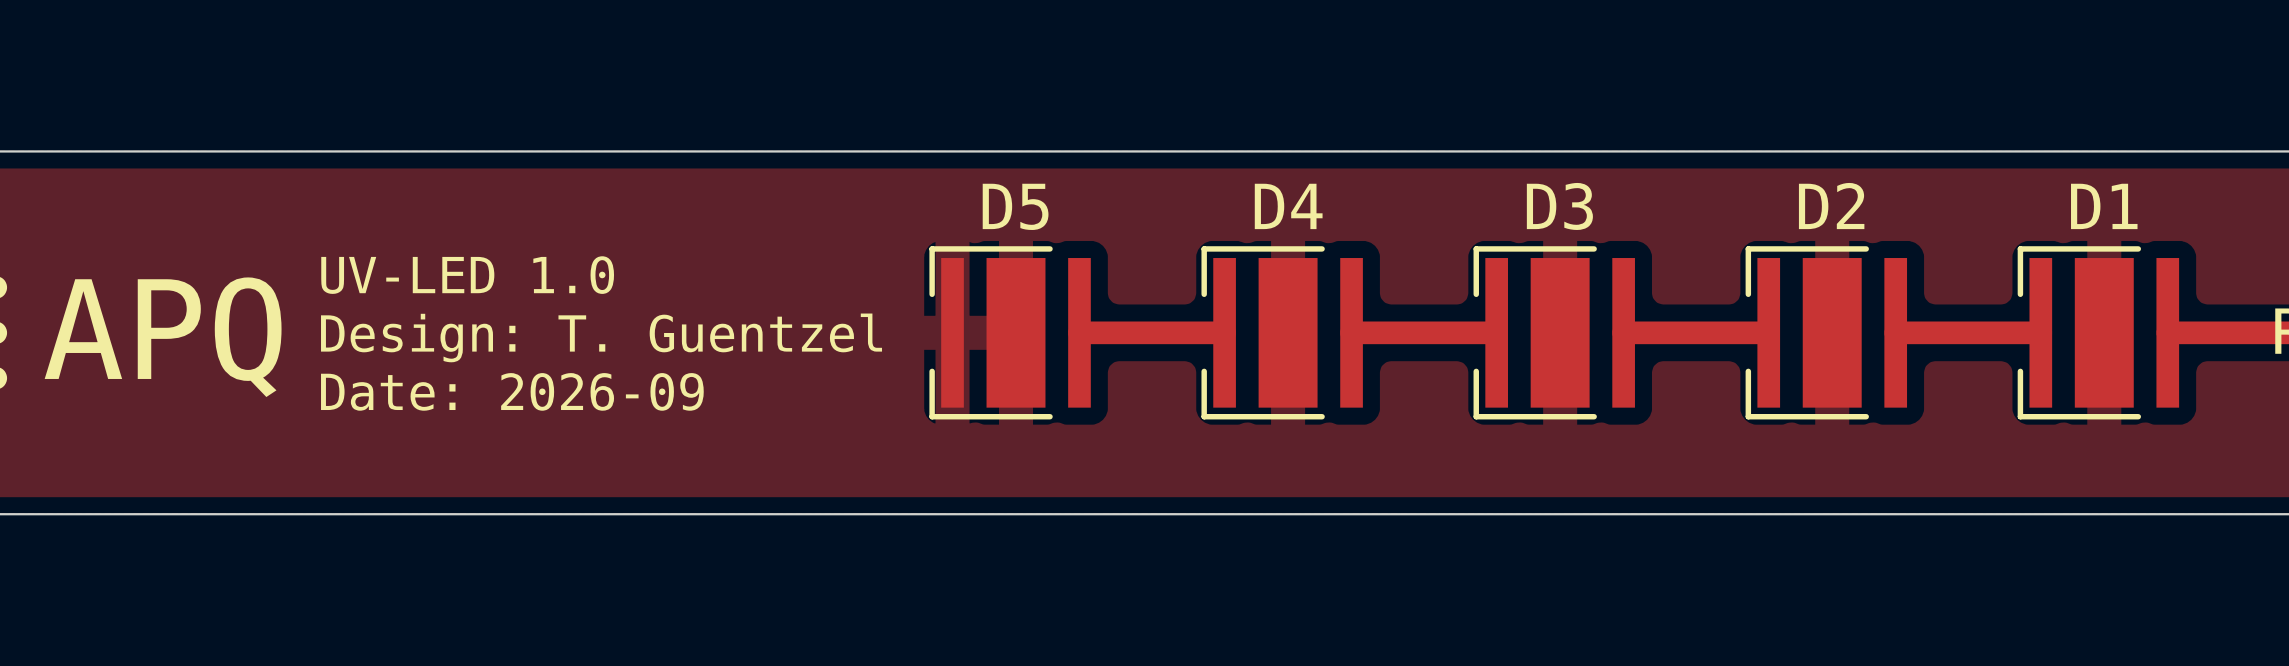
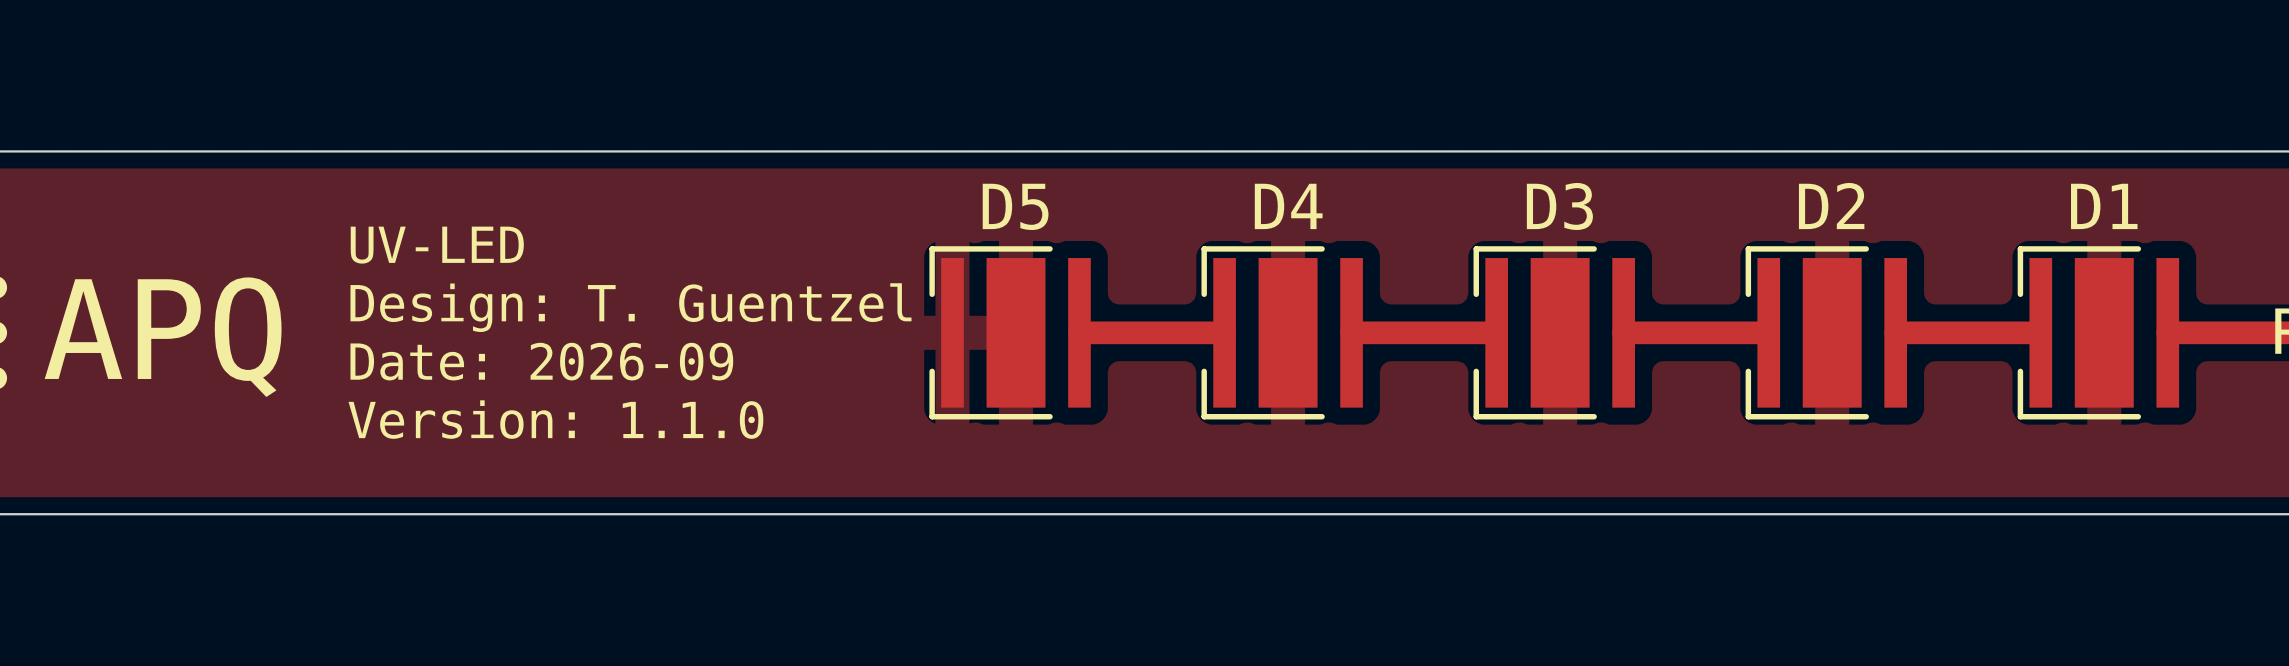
text: UV-LED 1.0 (467, 275) -> UV-LED (437, 245)
text position: Design: T. Guentzel (601, 337) -> Design: T. Guentzel (630, 307)
text position: Date: 2026-09 (512, 391) -> Date: 2026-09 (541, 361)
text: none -> Version: 1.1.0 (555, 419)

